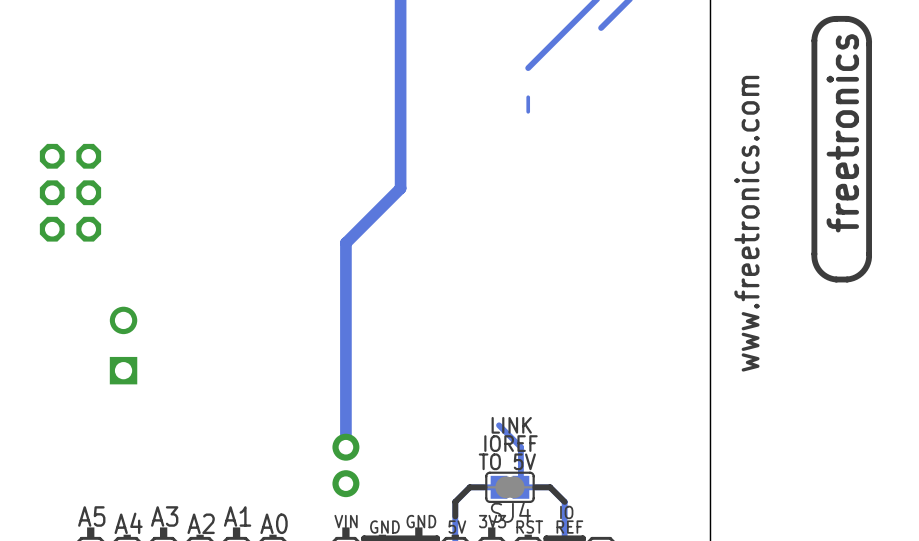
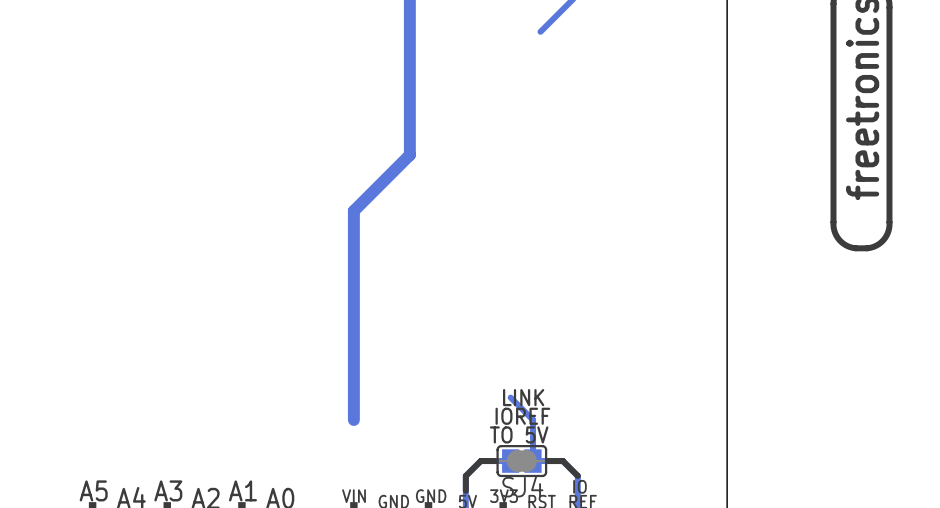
track: (528, 97) (528, 111) -> none
part: (70, 192) -> none
text: www.freetronics.com (746, 223) -> none
part: (123, 345) -> none
part: (345, 465) -> none

